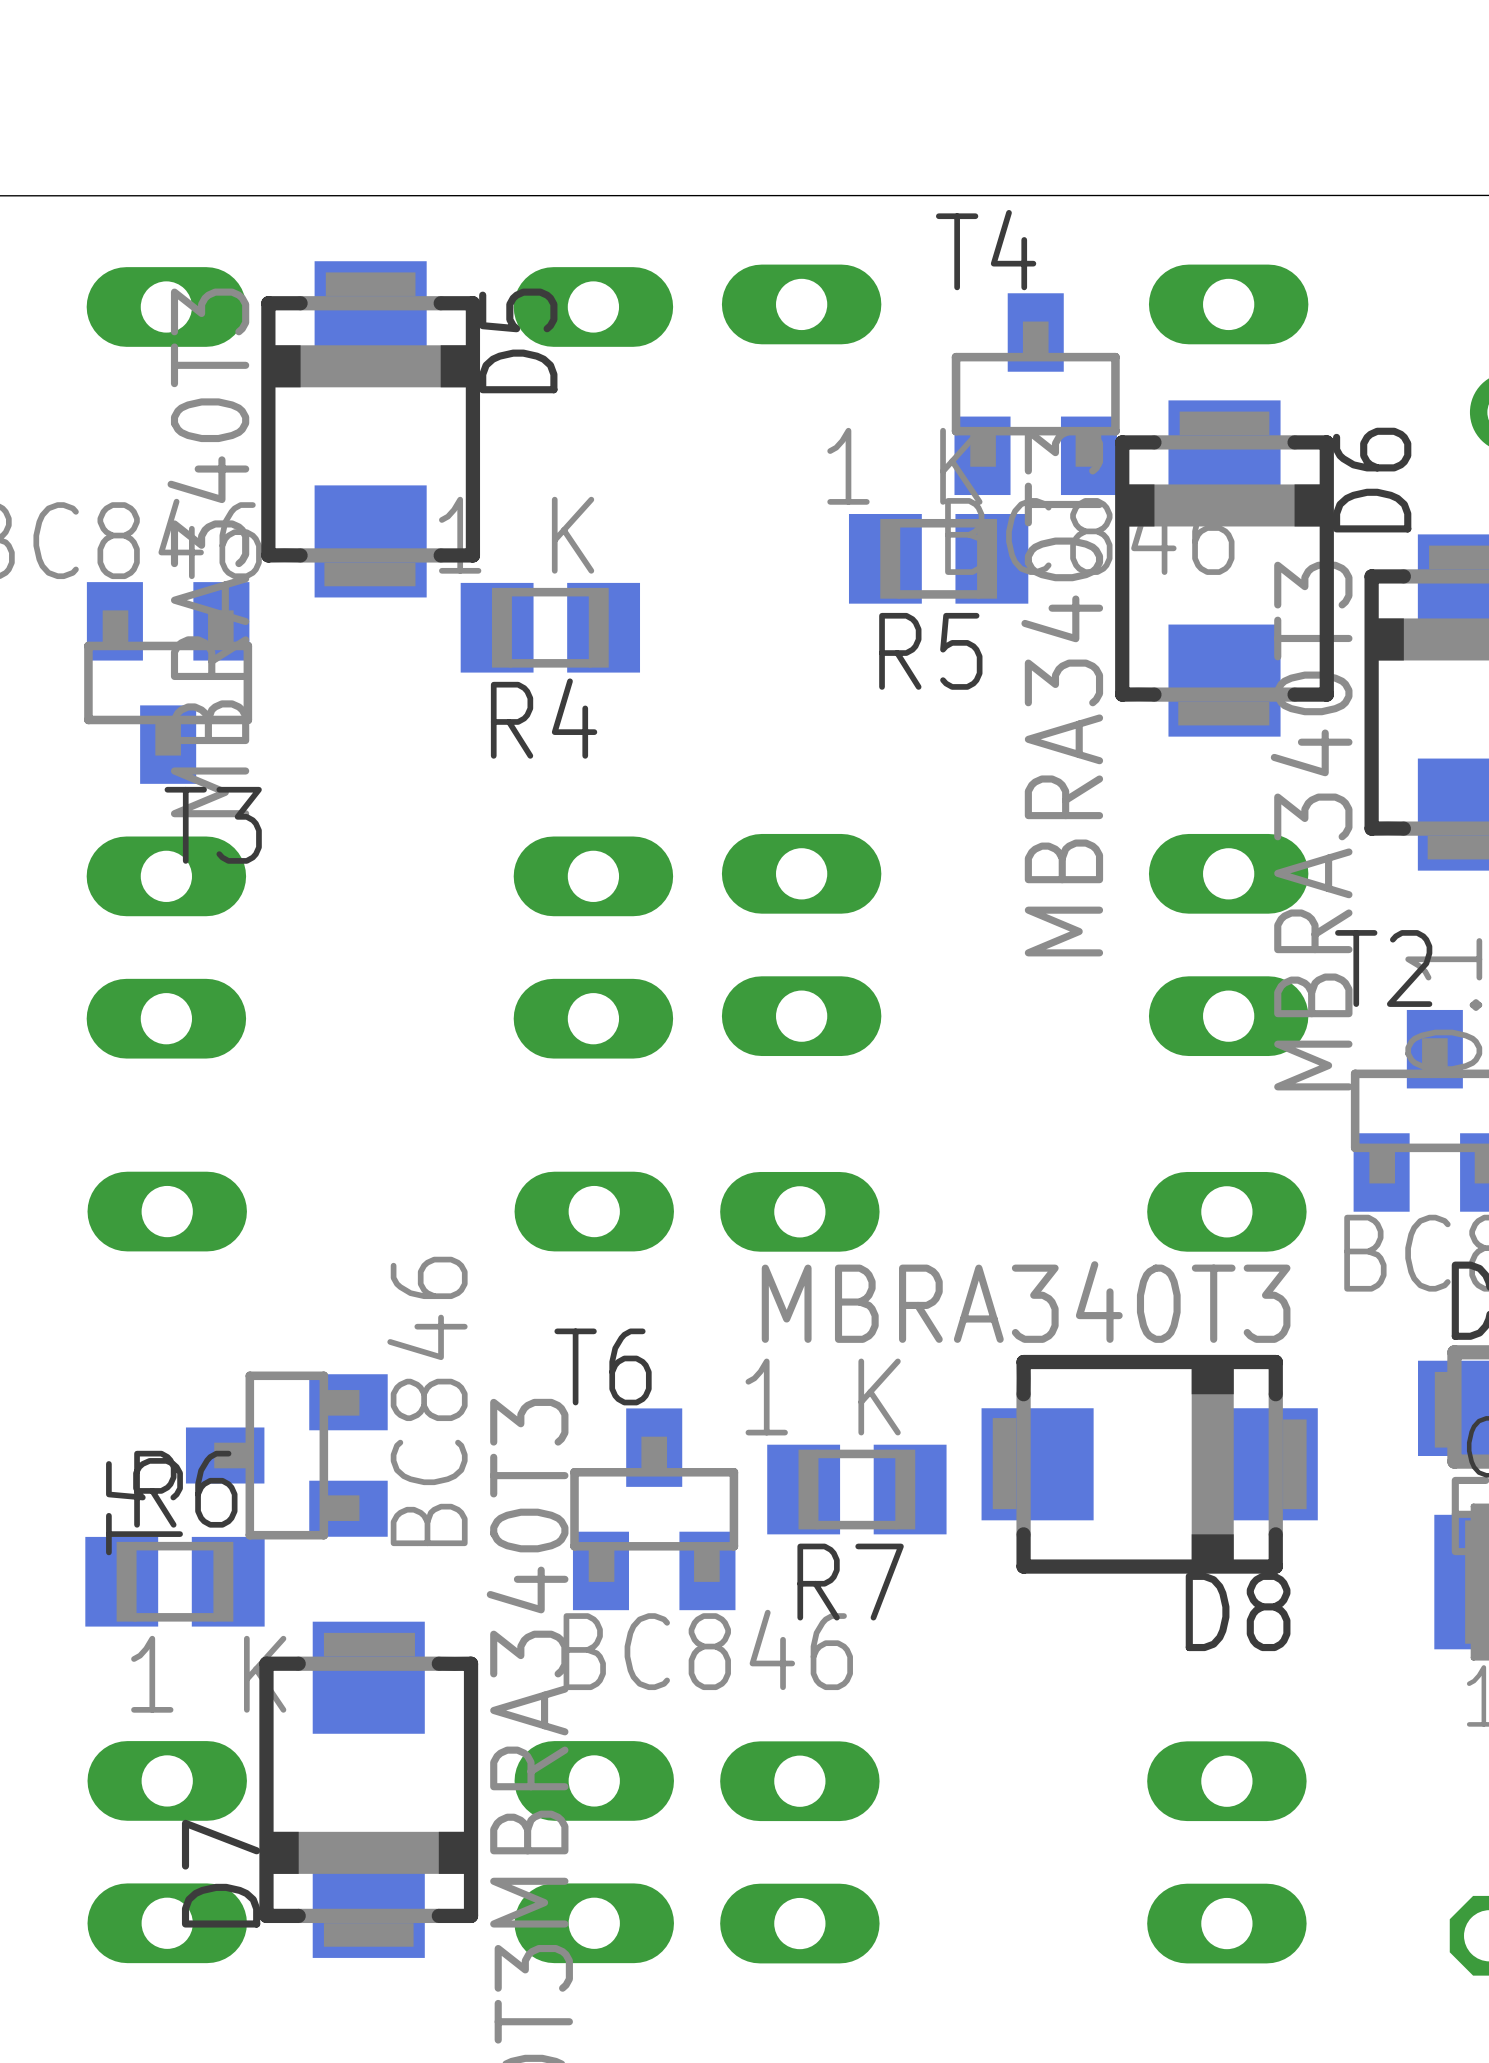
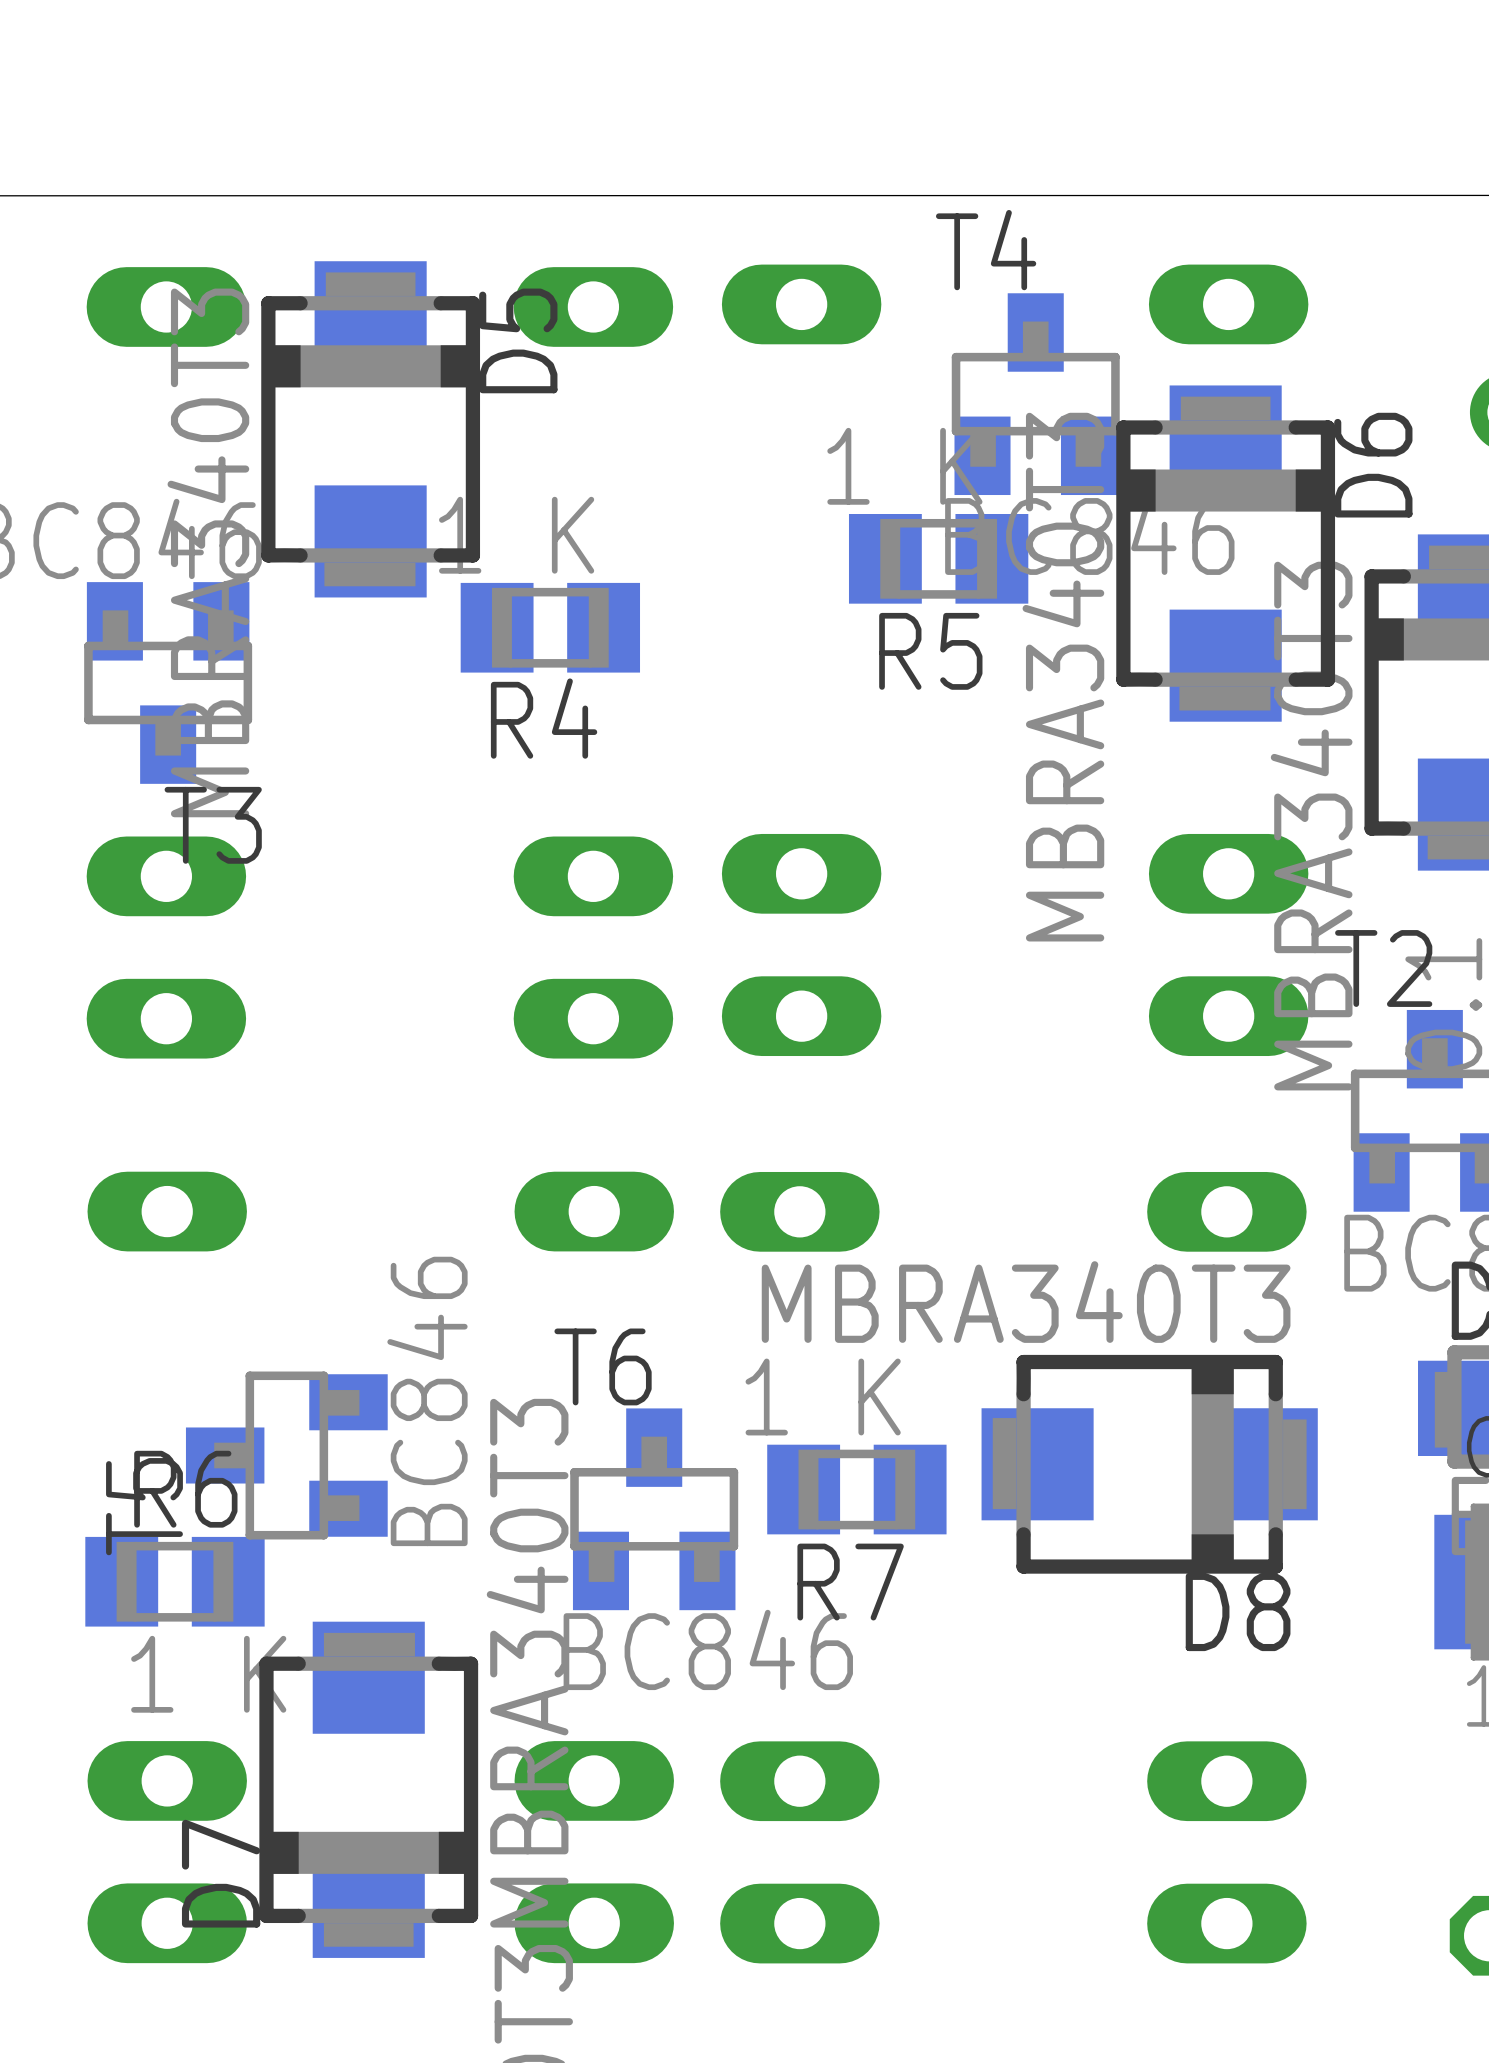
D6 position: (1224, 568) -> (1225, 553)

